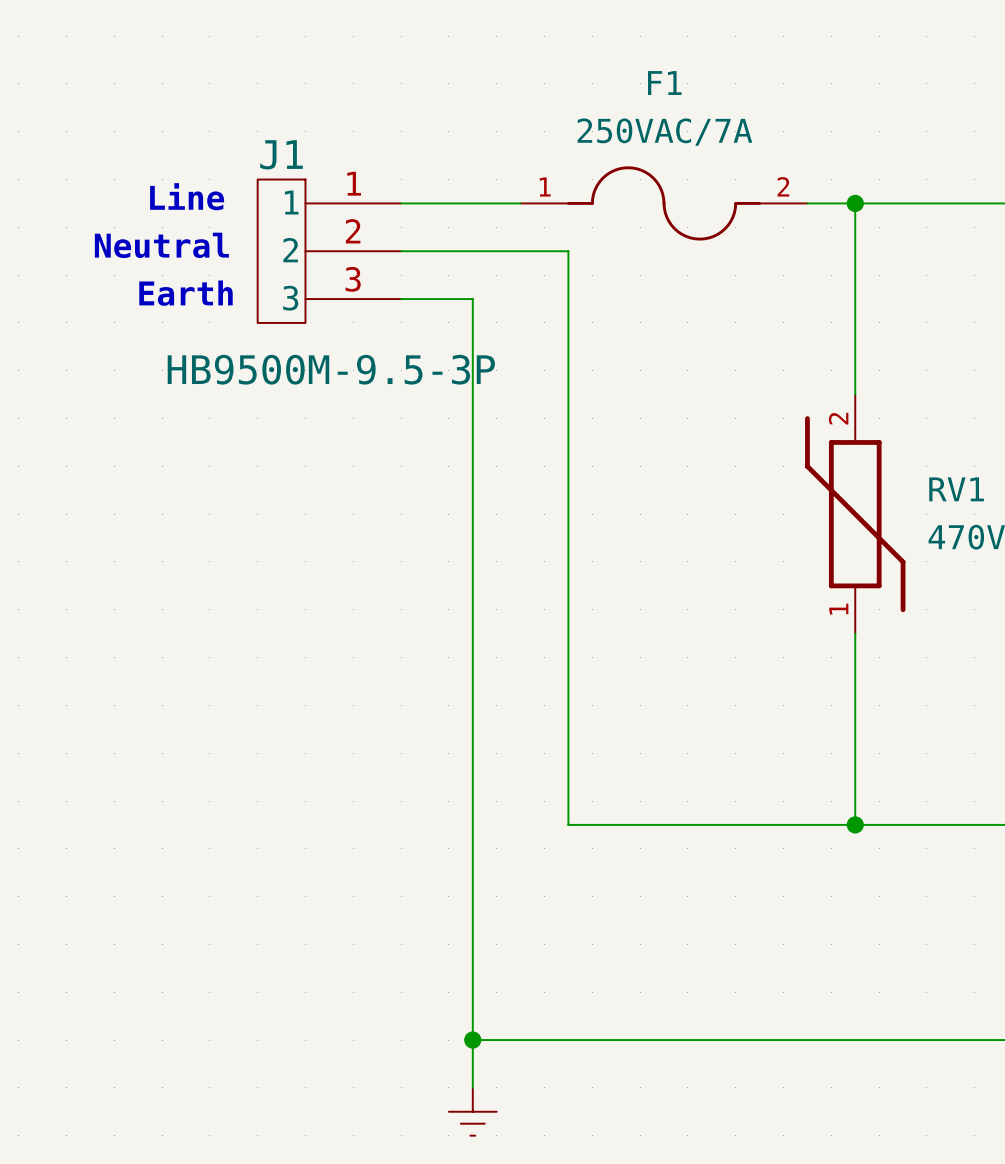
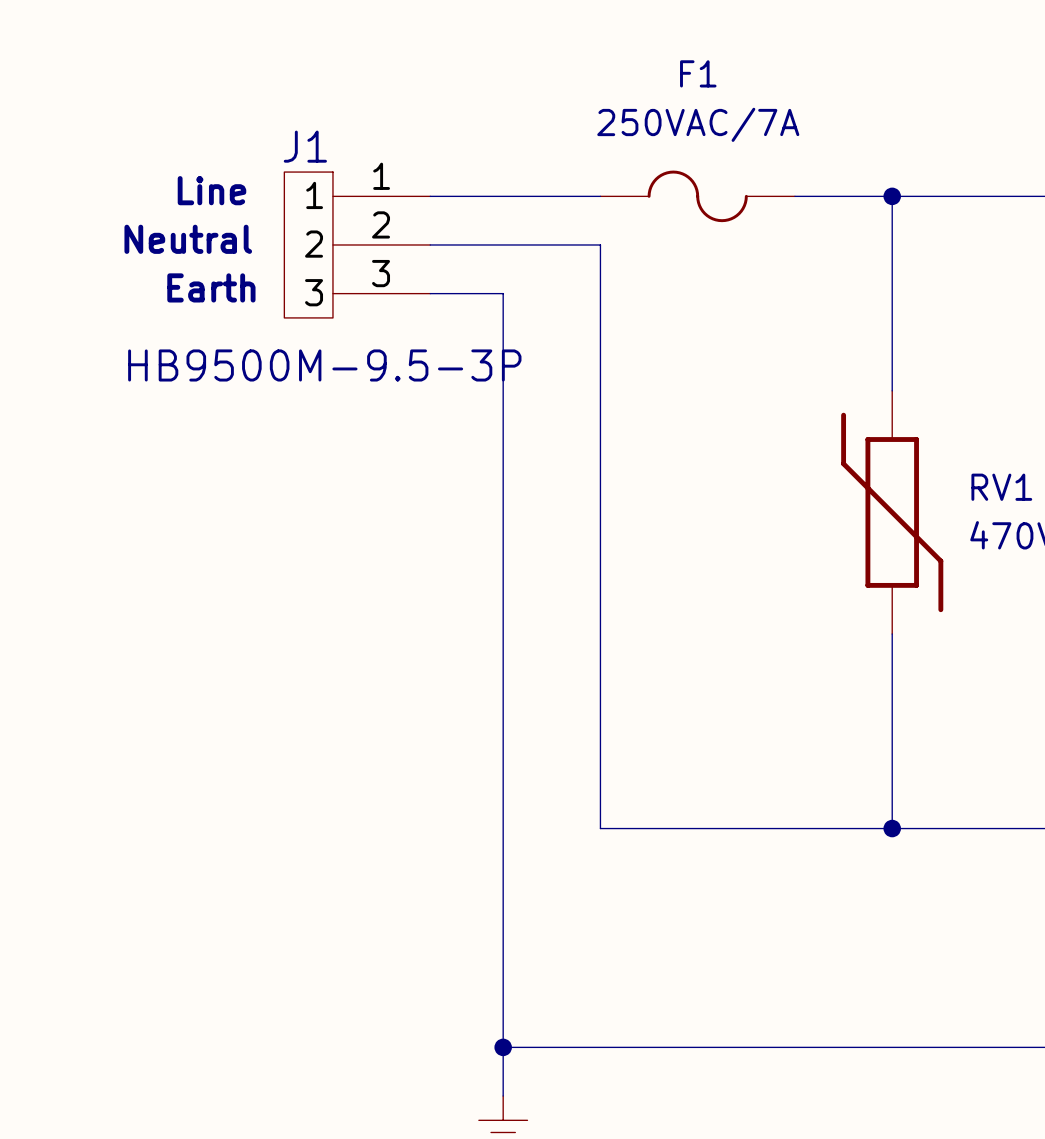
F1 symbol: [520, 166, 808, 241] -> [600, 170, 795, 223]
RV1 pin number: 2 (838, 418) -> none
RV1 pin number: 1 (838, 609) -> none

